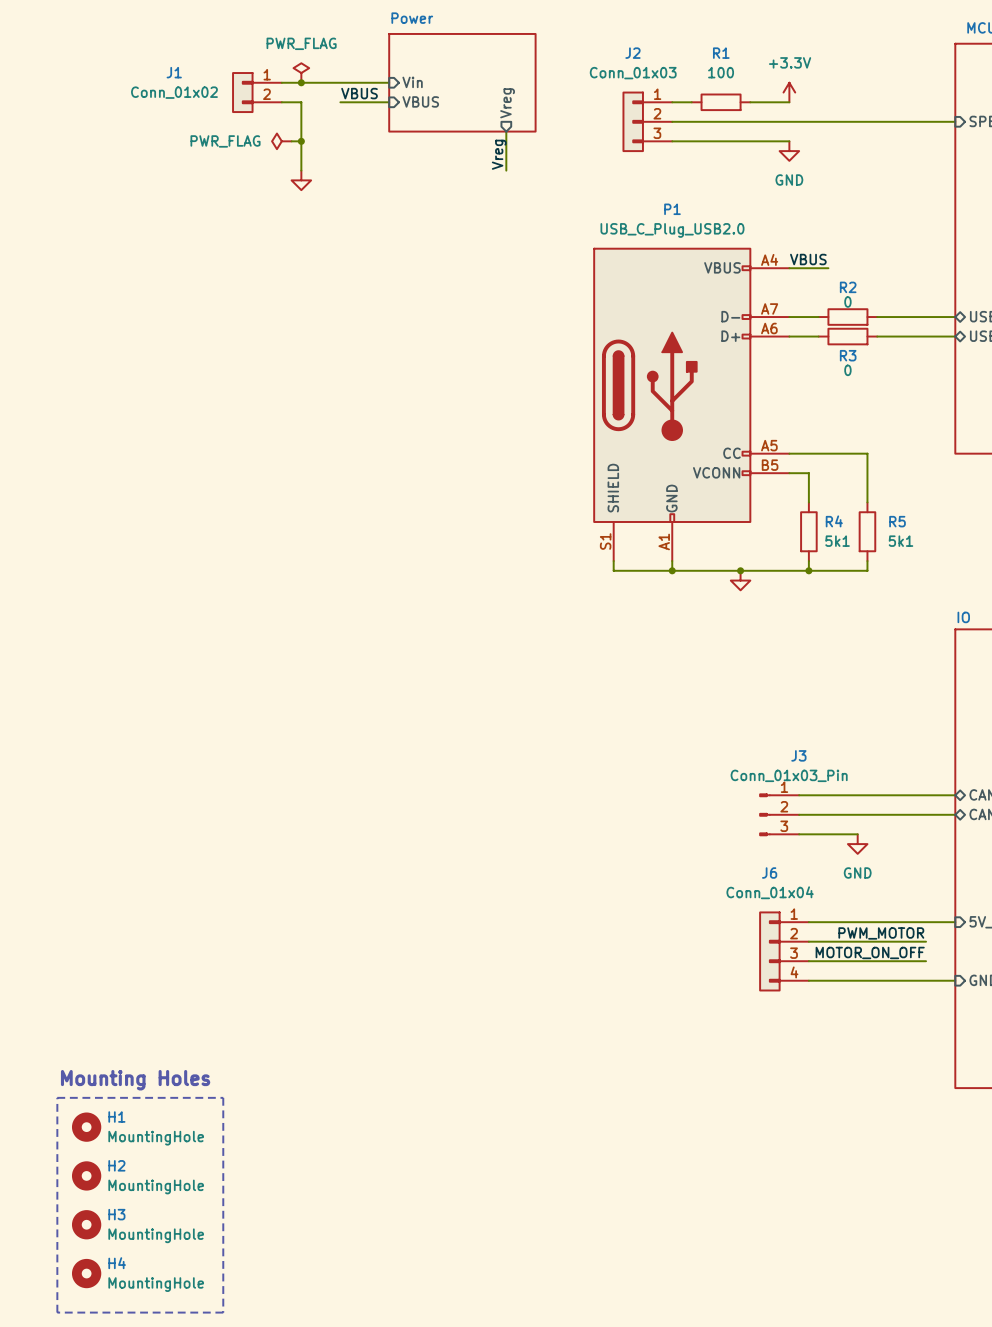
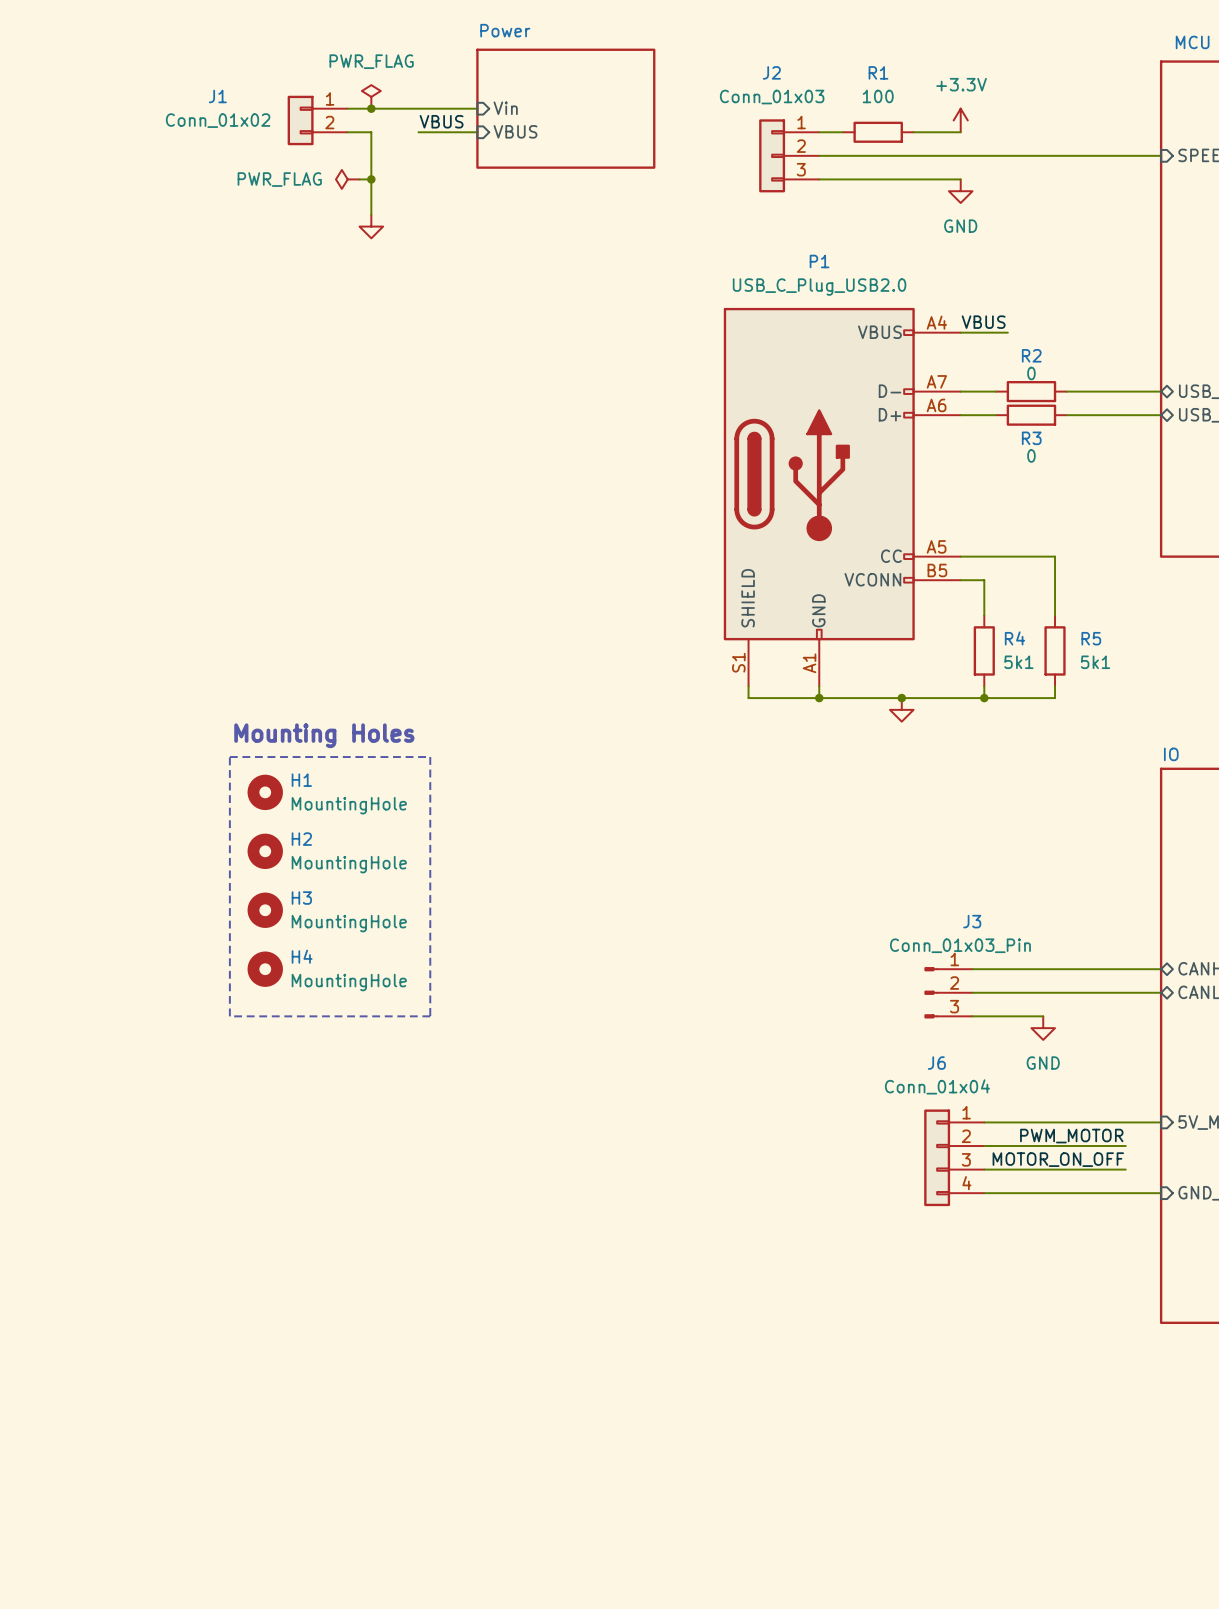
sheet pin: Vreg (507, 103) -> none
wire: (506, 131) (506, 170) -> none
label: Vreg (499, 154) -> none
text: none -> Mounting Holes (324, 735)
line: none -> (229, 757) (430, 757) (430, 1016) (229, 1016) (229, 757)
text: Mounting Holes (135, 1080) -> none
line: (57, 1097) (223, 1097) (223, 1312) (57, 1312) (57, 1097) -> none
H1 position: (86, 1127) -> (265, 792)
H2 position: (86, 1175) -> (265, 851)
H3 position: (86, 1224) -> (265, 910)
H4 position: (86, 1273) -> (265, 969)

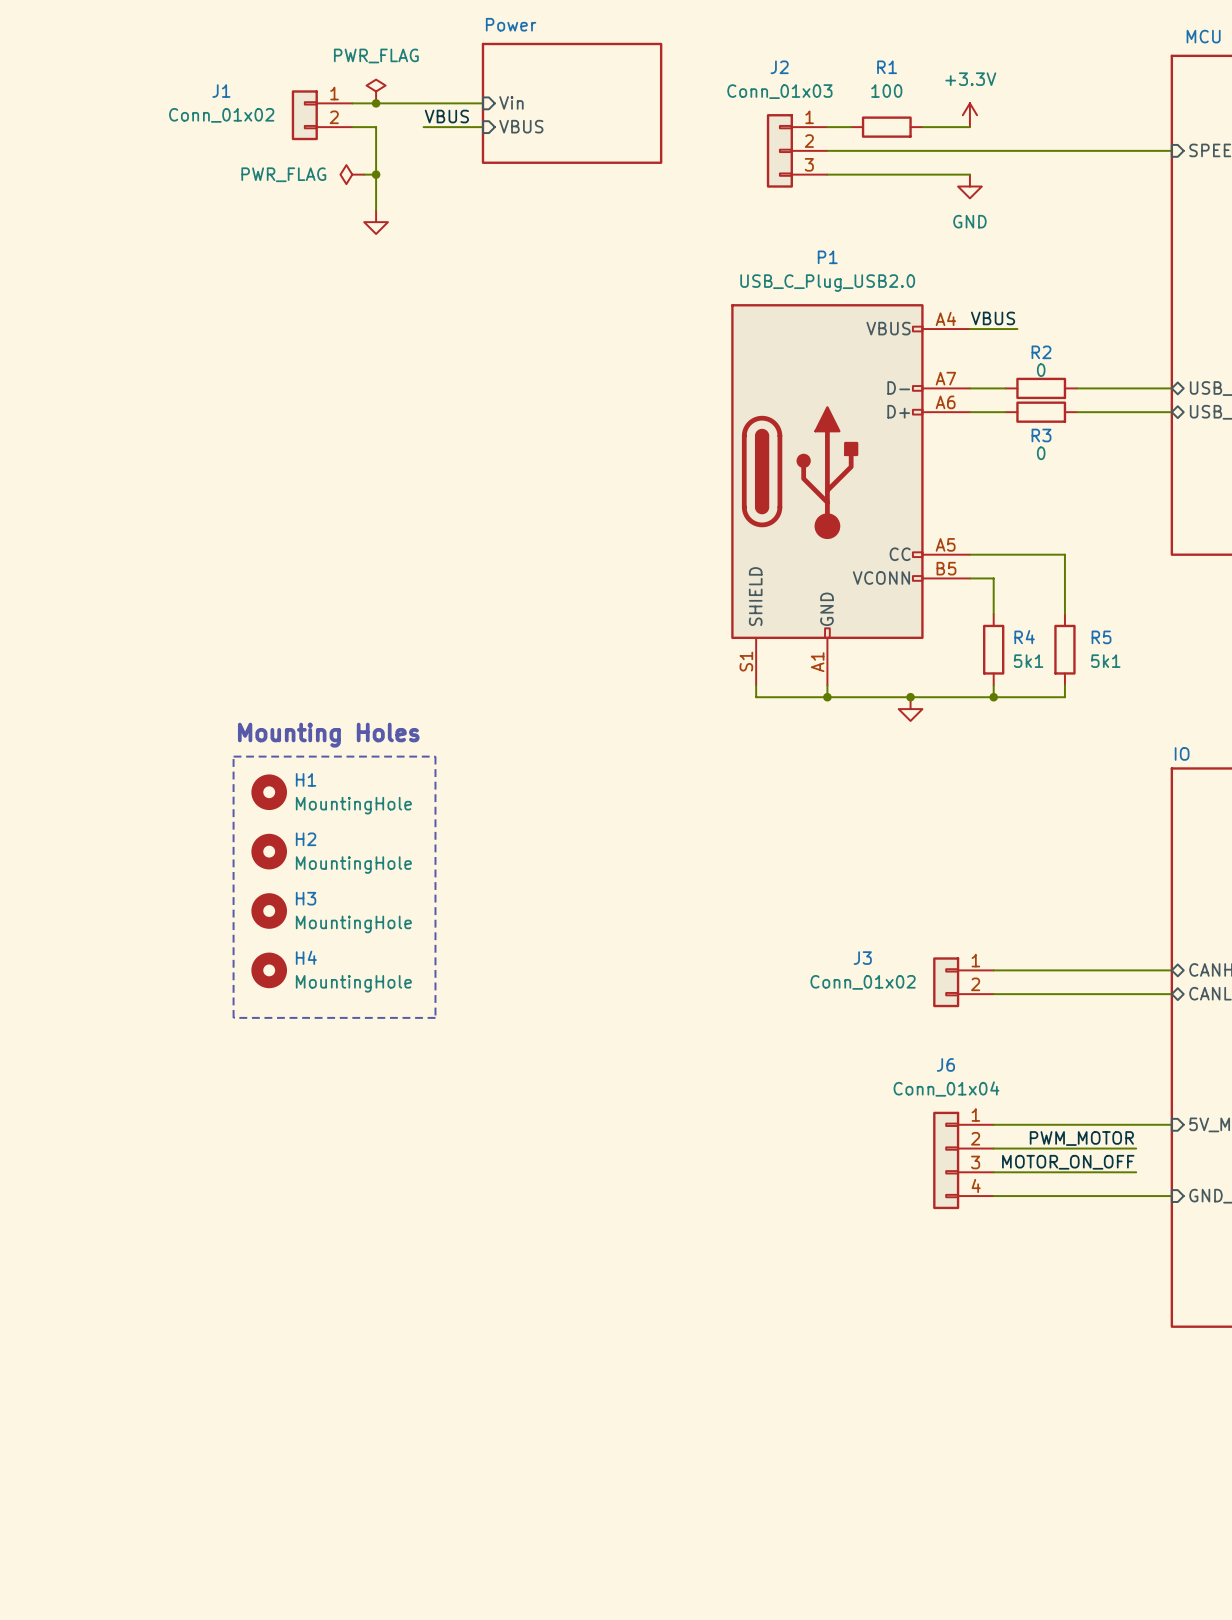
J3 name position: J3 (972, 921) -> J3 (862, 958)
J3 value: Conn_01x03_Pin (960, 945) -> Conn_01x02 (863, 982)
J3 symbol: [924, 967, 973, 1019] -> [933, 957, 994, 1008]
wire: (972, 1016) (1043, 1016) -> none
power symbol: GND (1043, 1028) -> none

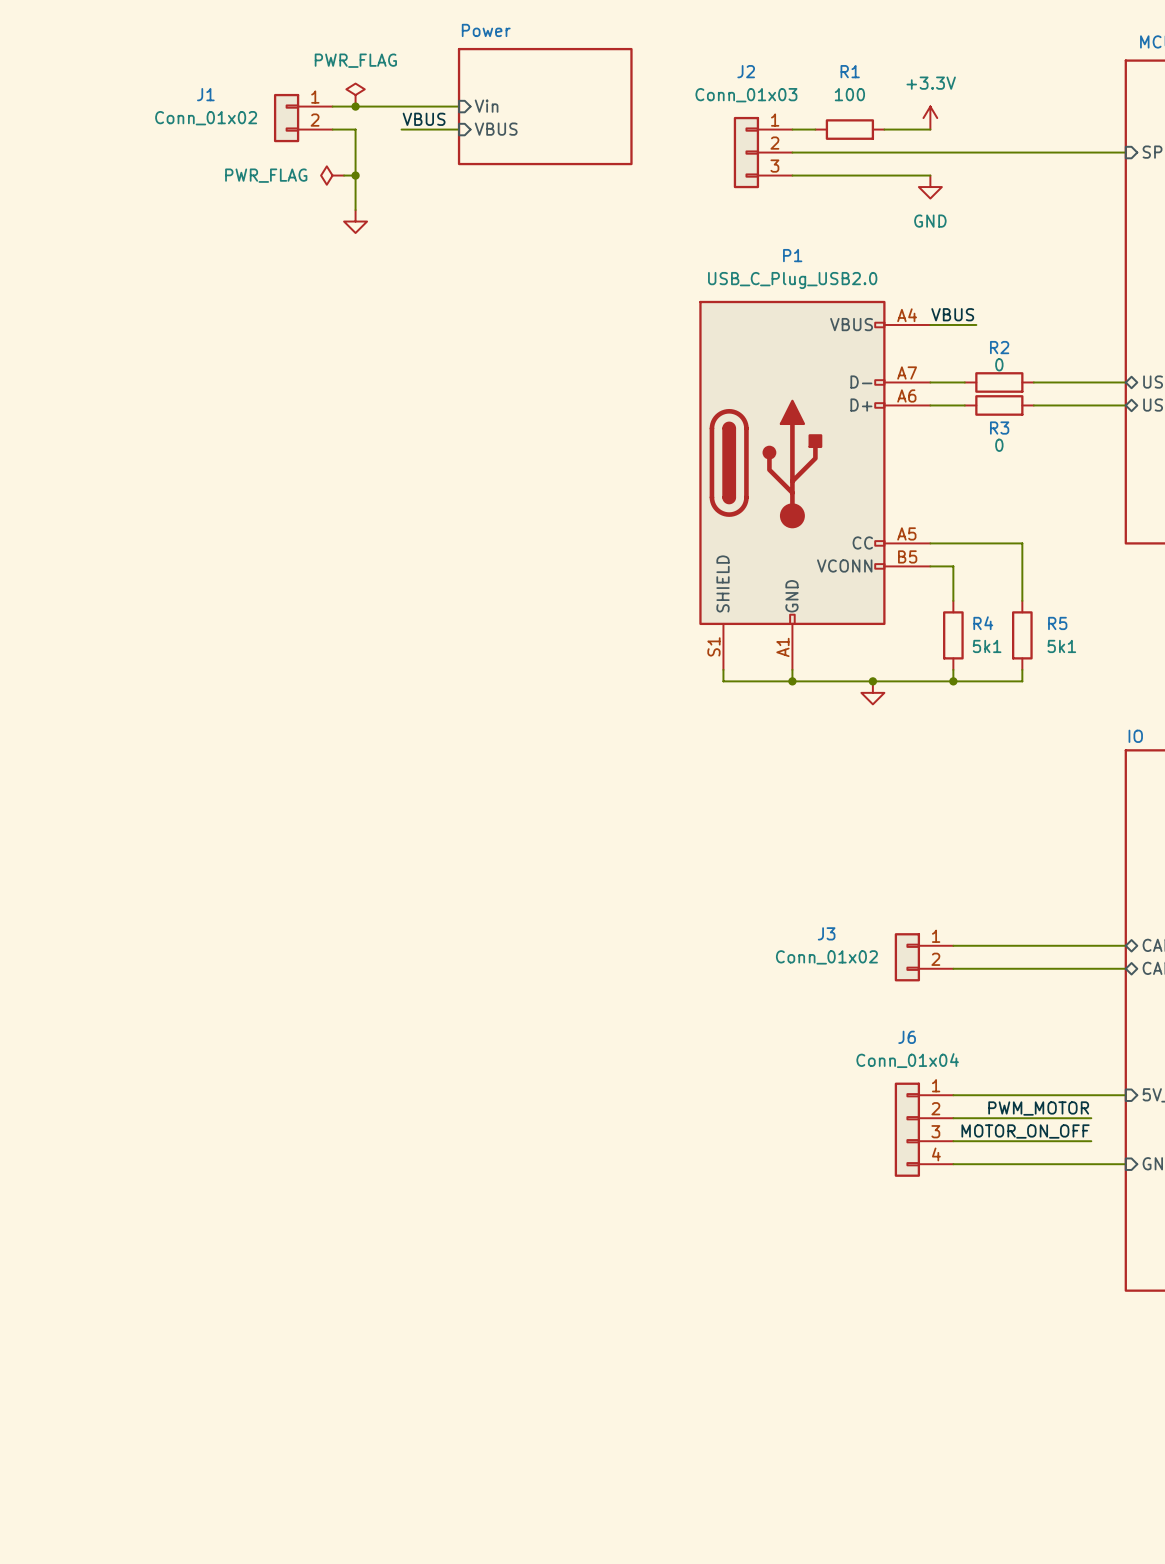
text: Mounting Holes (328, 735) -> none
line: (233, 756) (435, 756) (435, 1017) (233, 1017) (233, 756) -> none
H1: MountingHole (269, 792) -> none
H2: MountingHole (269, 851) -> none
H3: MountingHole (269, 911) -> none
H4: MountingHole (269, 970) -> none

